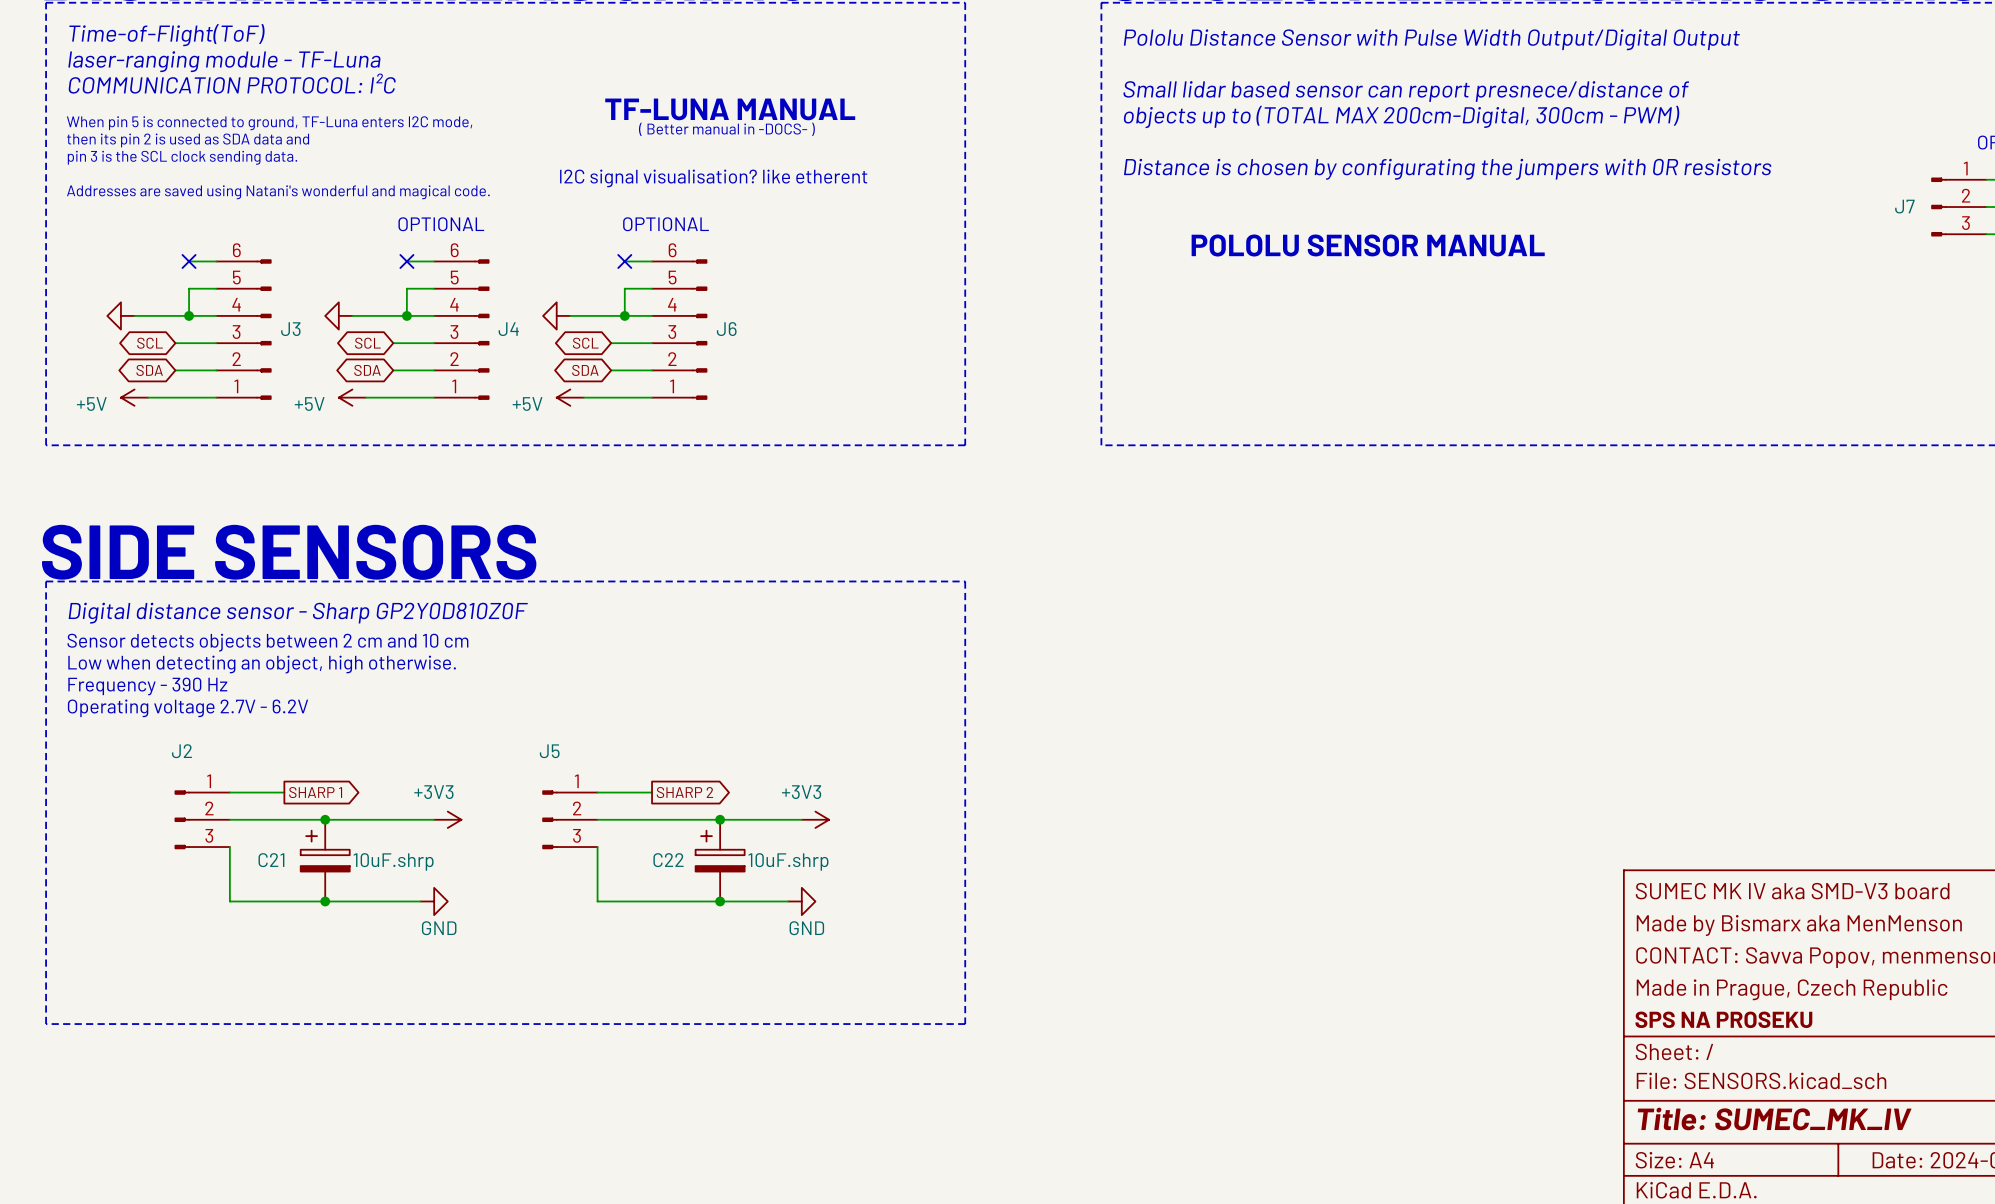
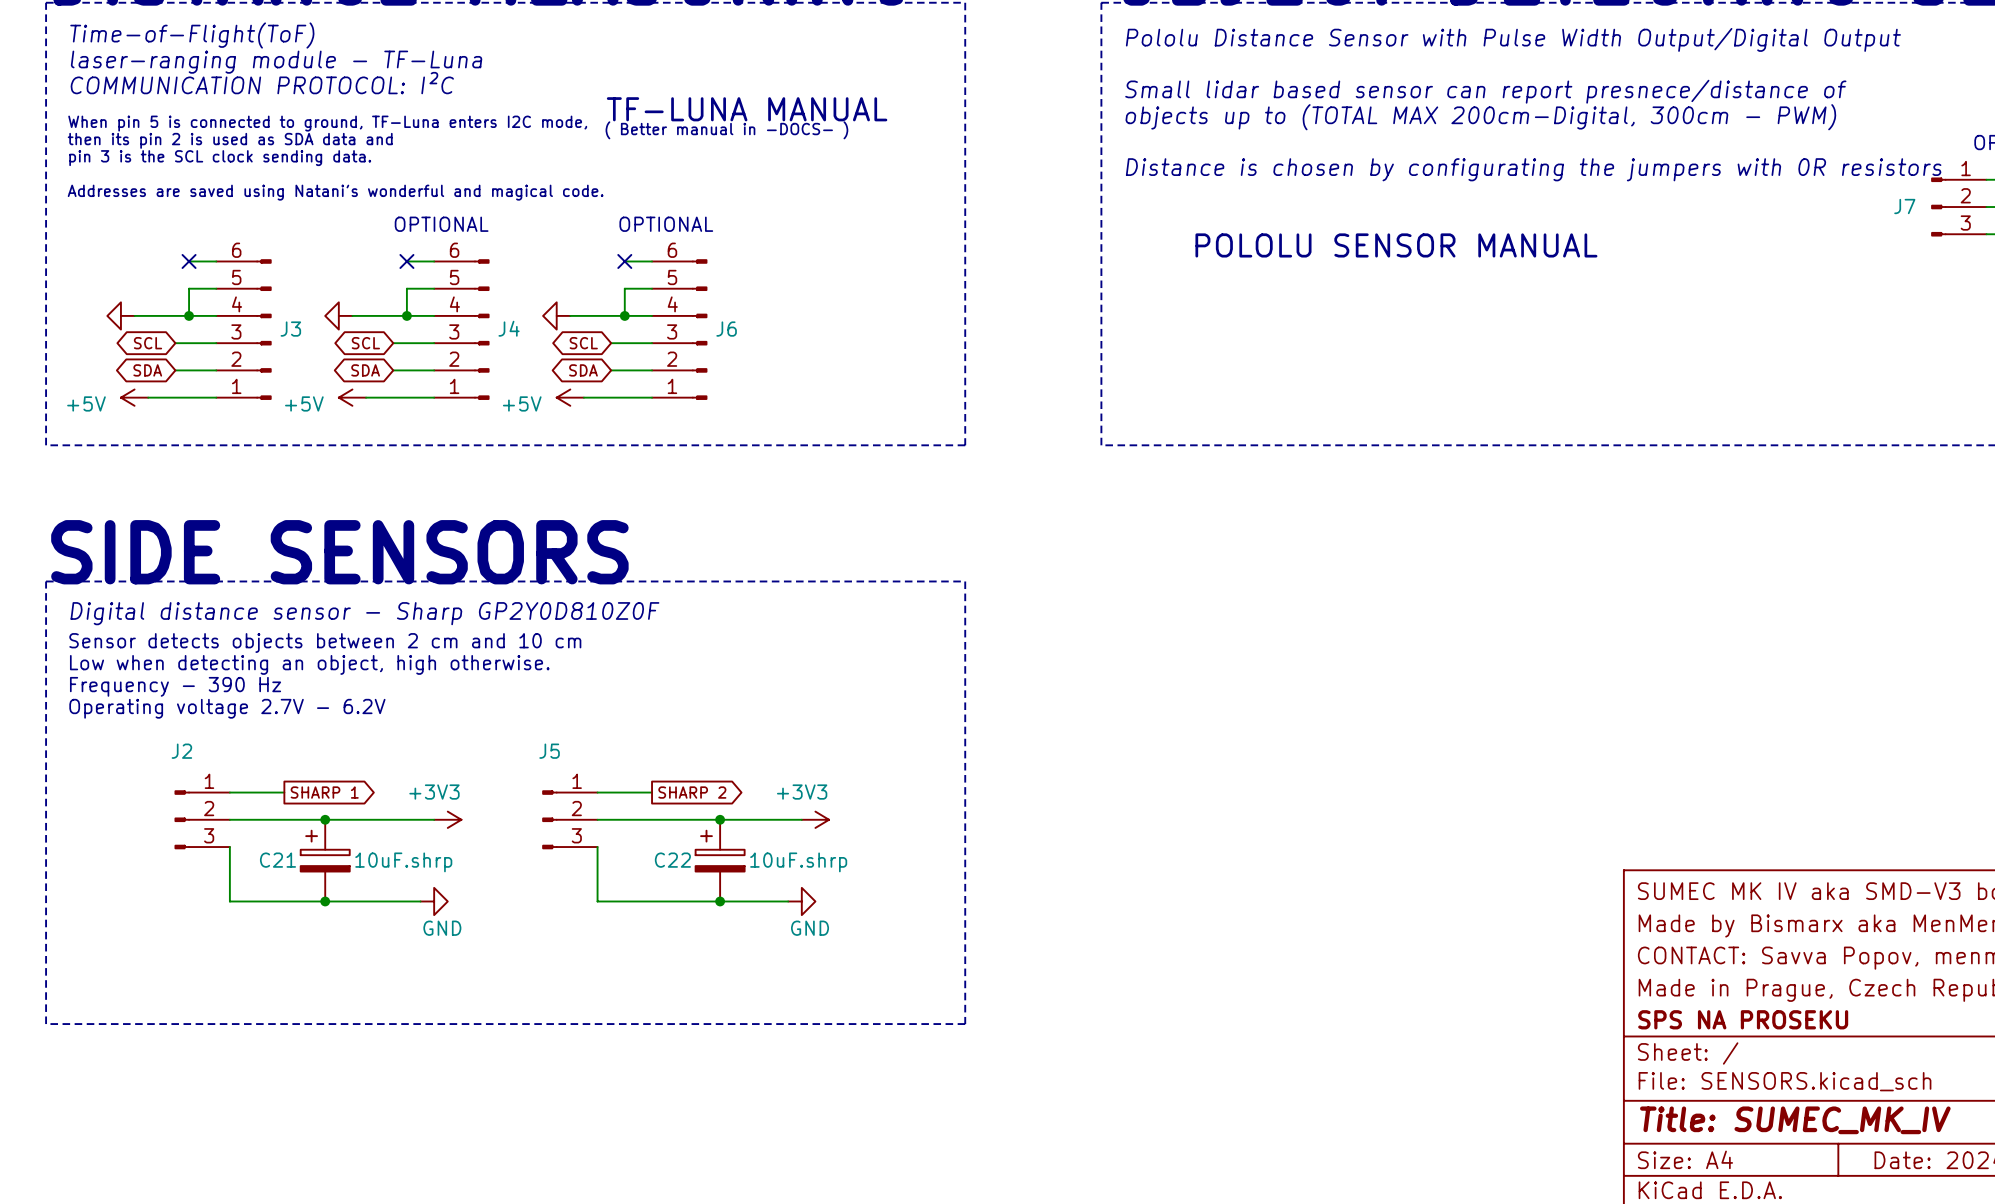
text: I2C signal visualisation? like etherent (713, 178) -> none

